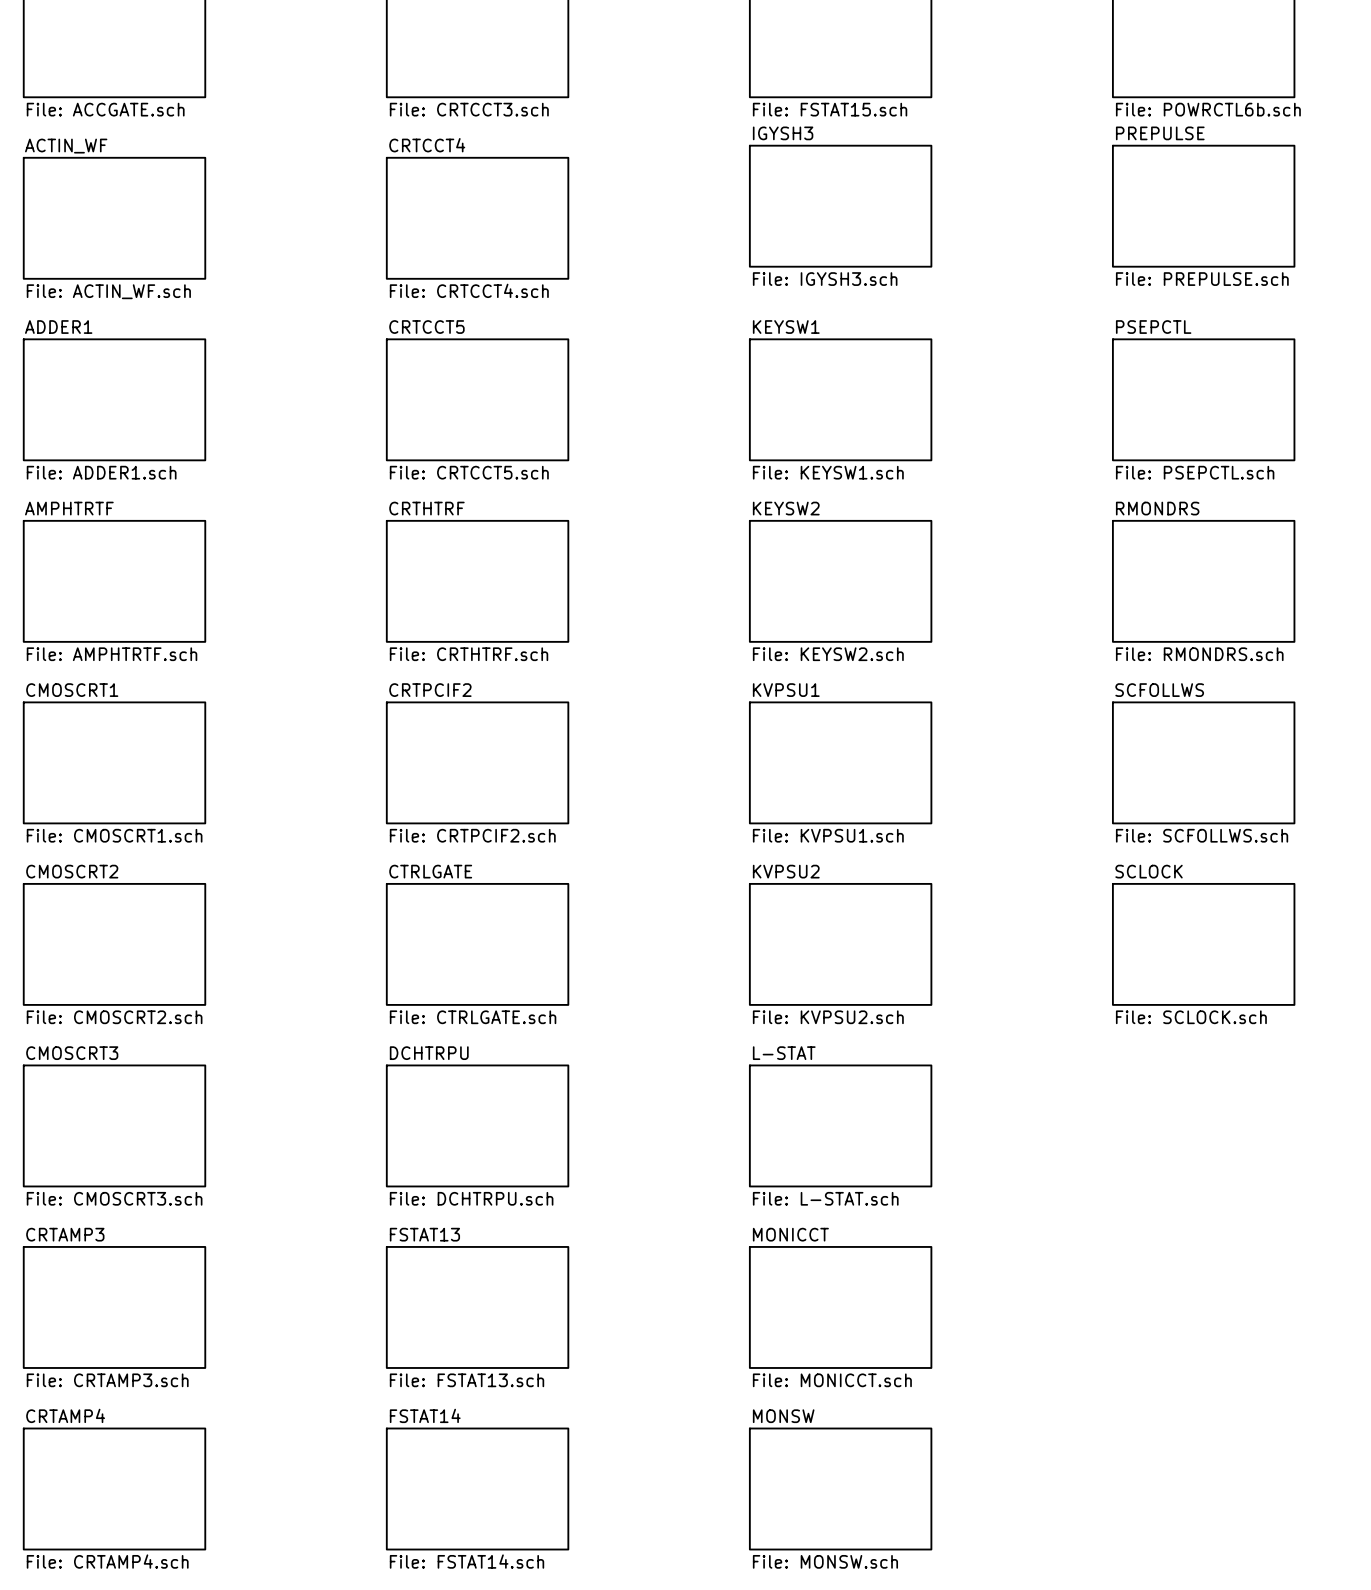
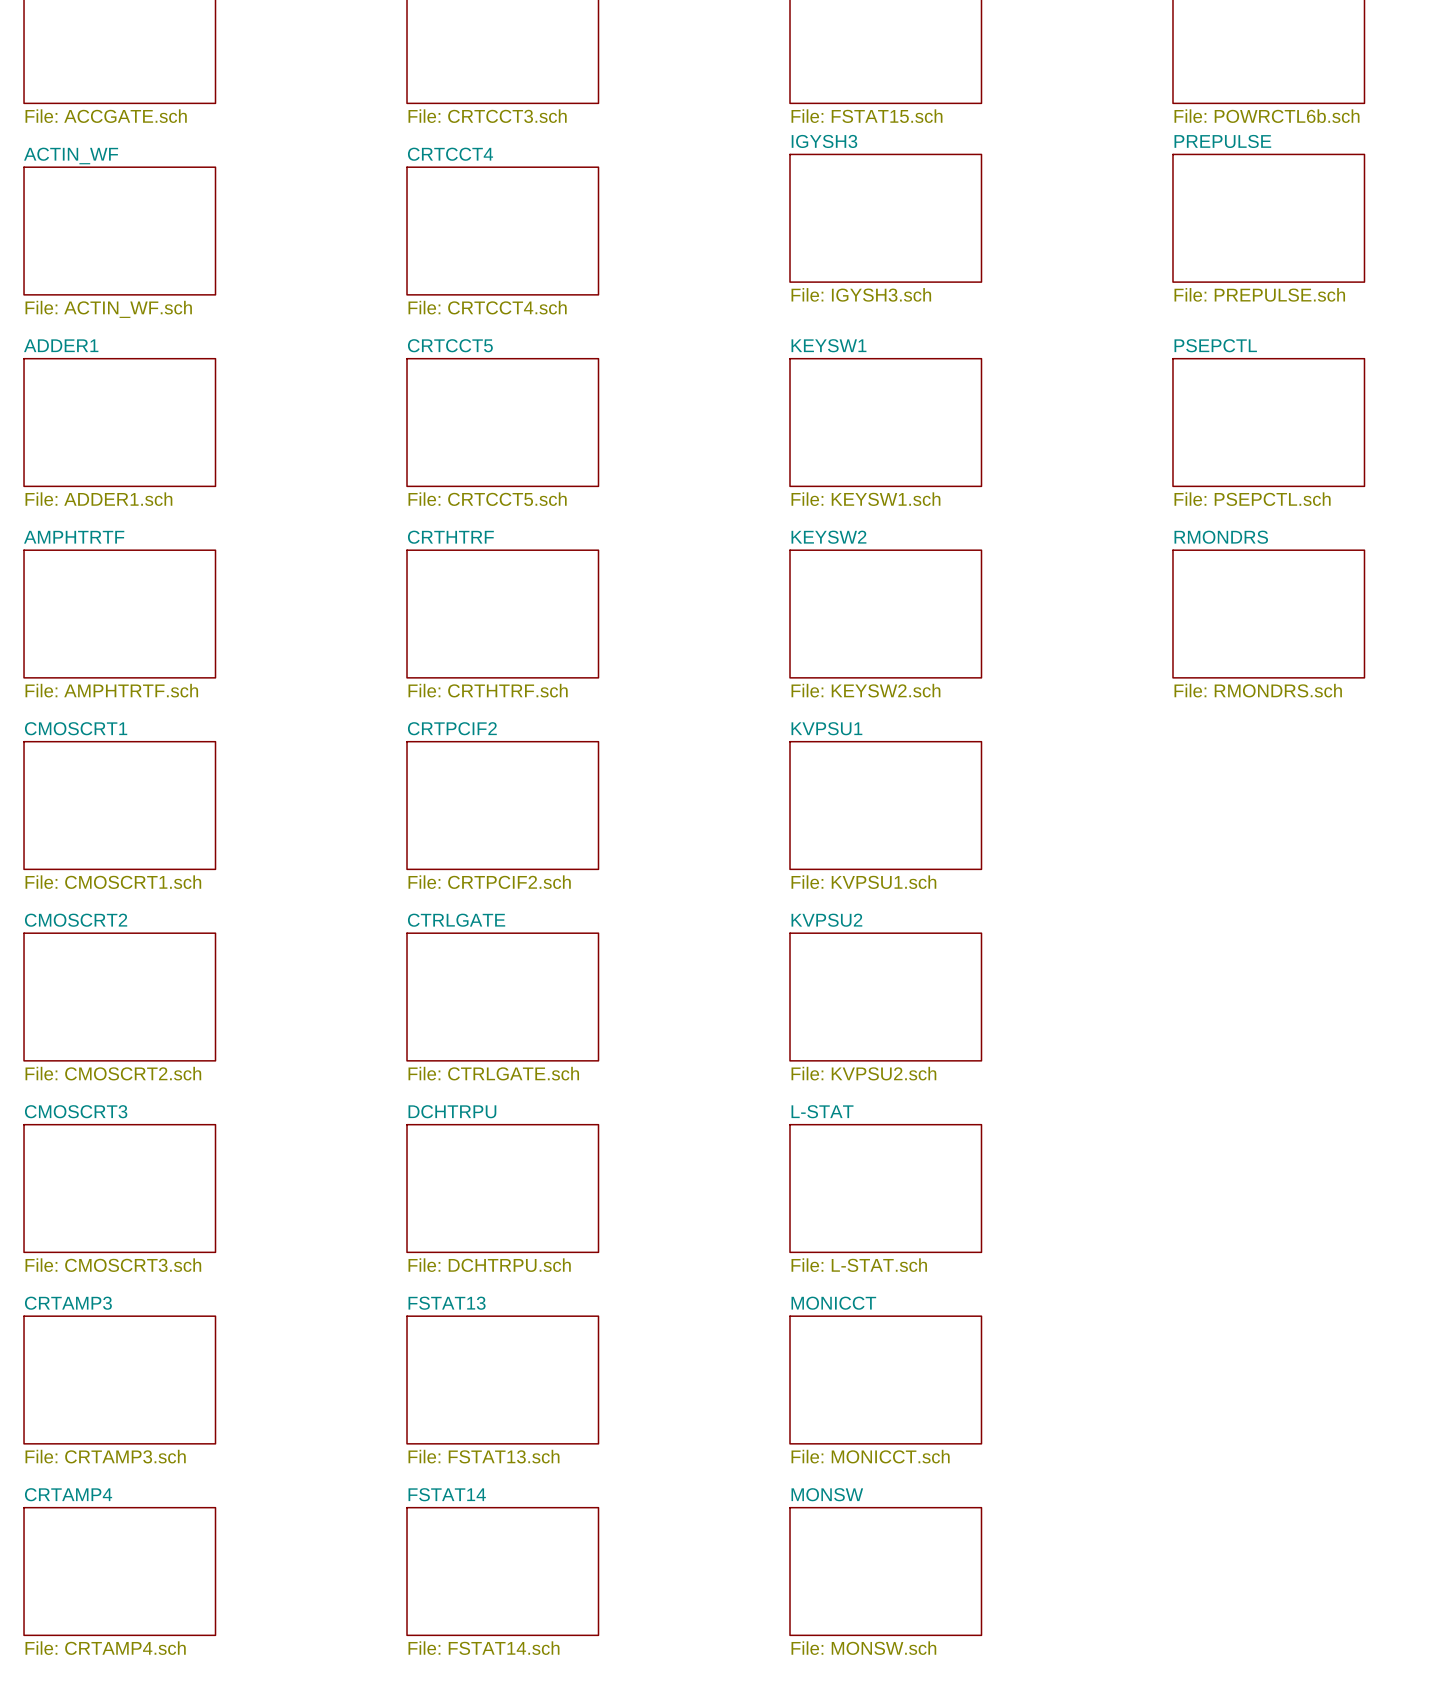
sheet SCFOLLWS: File: SCFOLLWS.sch (1203, 762) -> none
sheet SCLOCK: File: SCLOCK.sch (1203, 944) -> none

